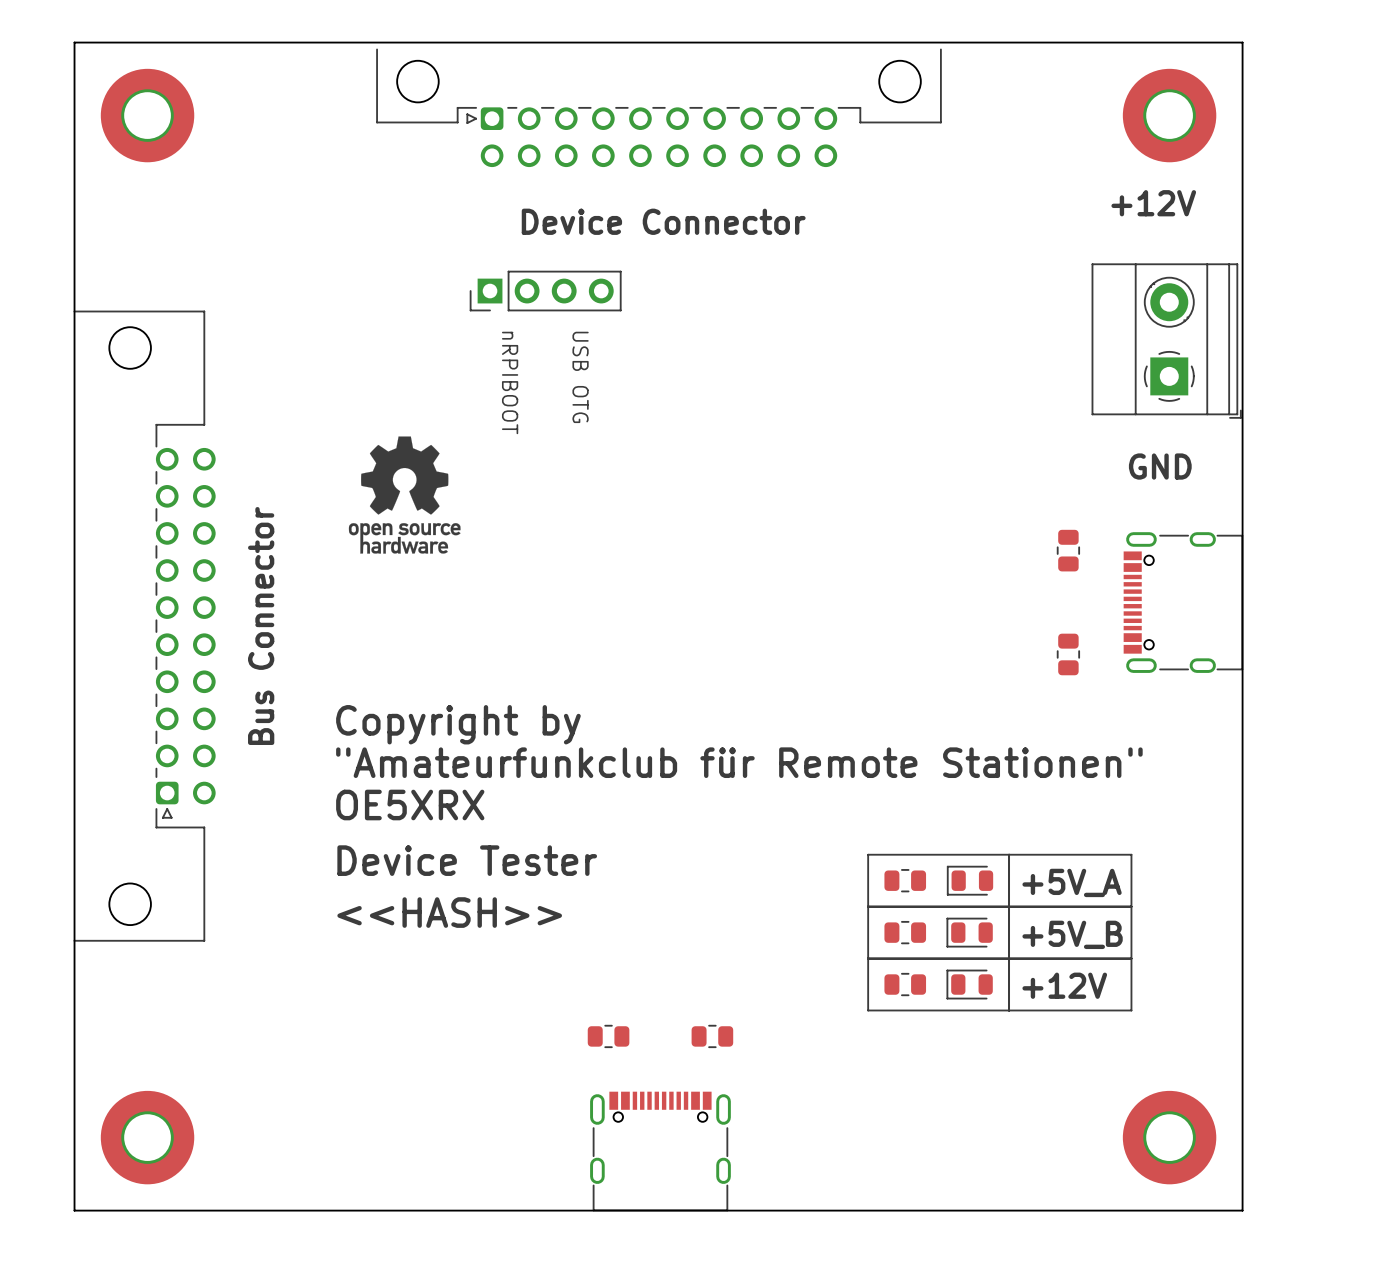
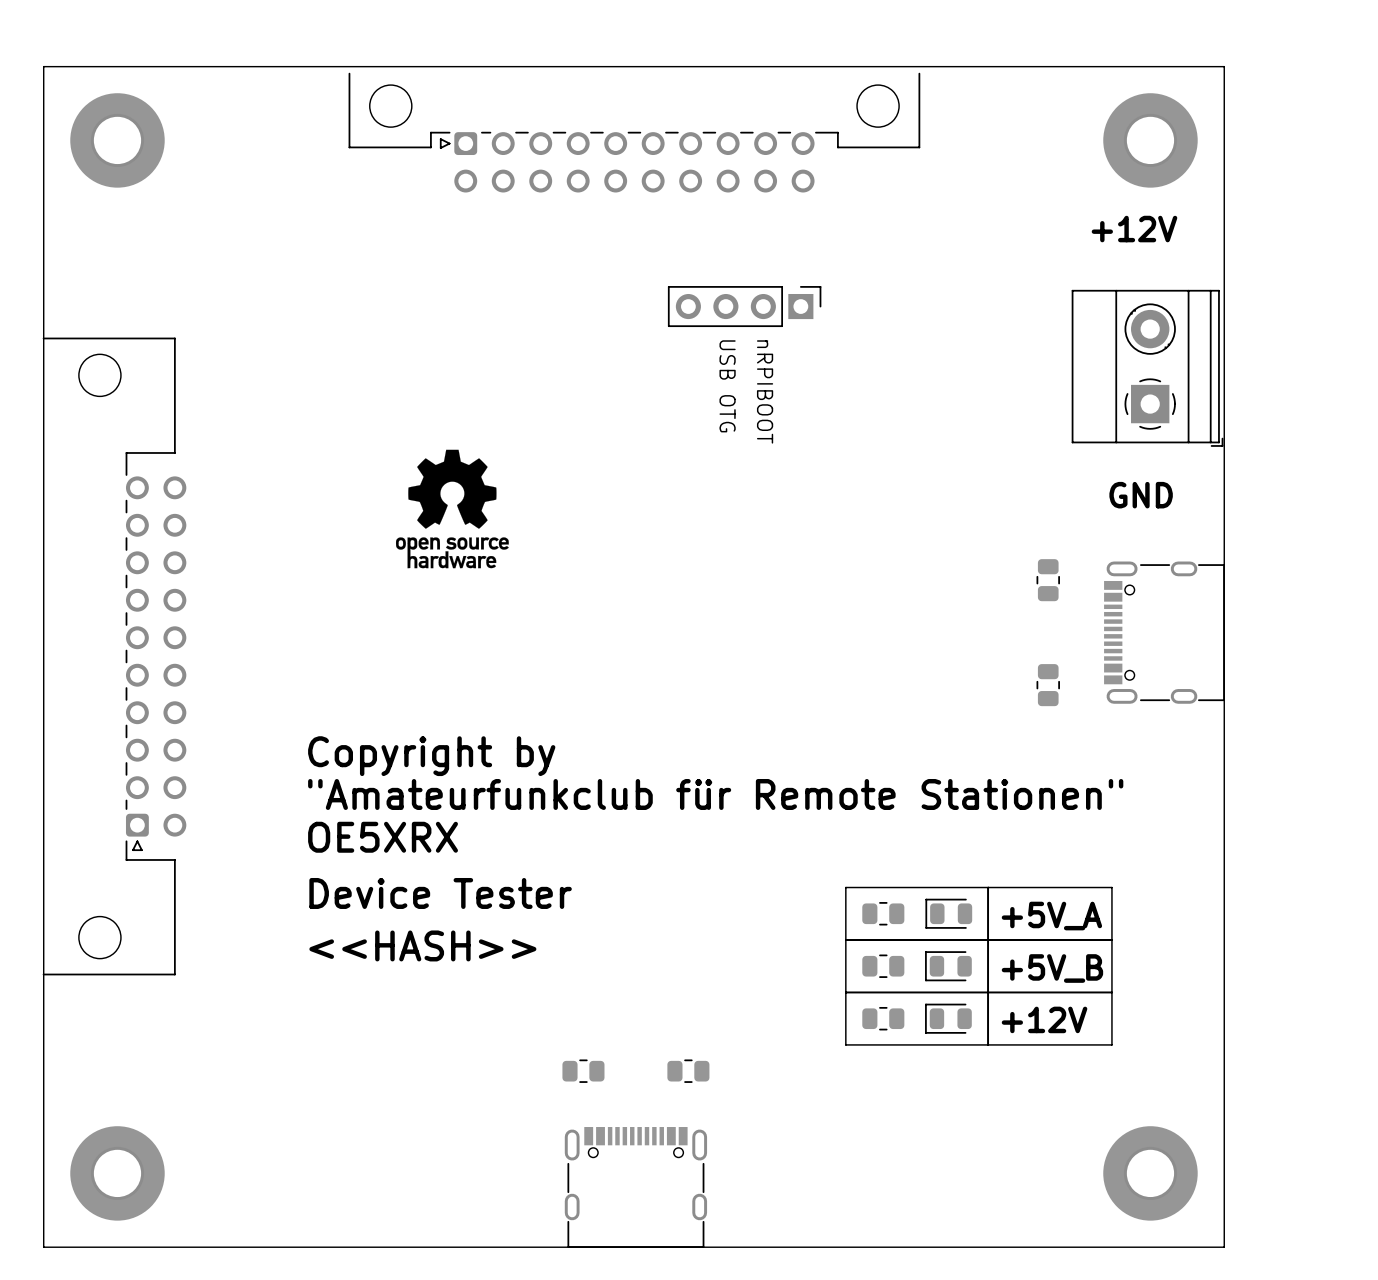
text: Device Connector (663, 221) -> none
part rotation: 0° (545, 291) -> 180° (744, 306)
part position: (545, 291) -> (744, 306)
text position: USB OTG (580, 377) -> USB OTG (727, 386)
text position: nRPIBOOT (510, 382) -> nRPIBOOT (765, 391)
drawing position: (404, 495) -> (452, 509)
text: Bus Connector (261, 625) -> none

